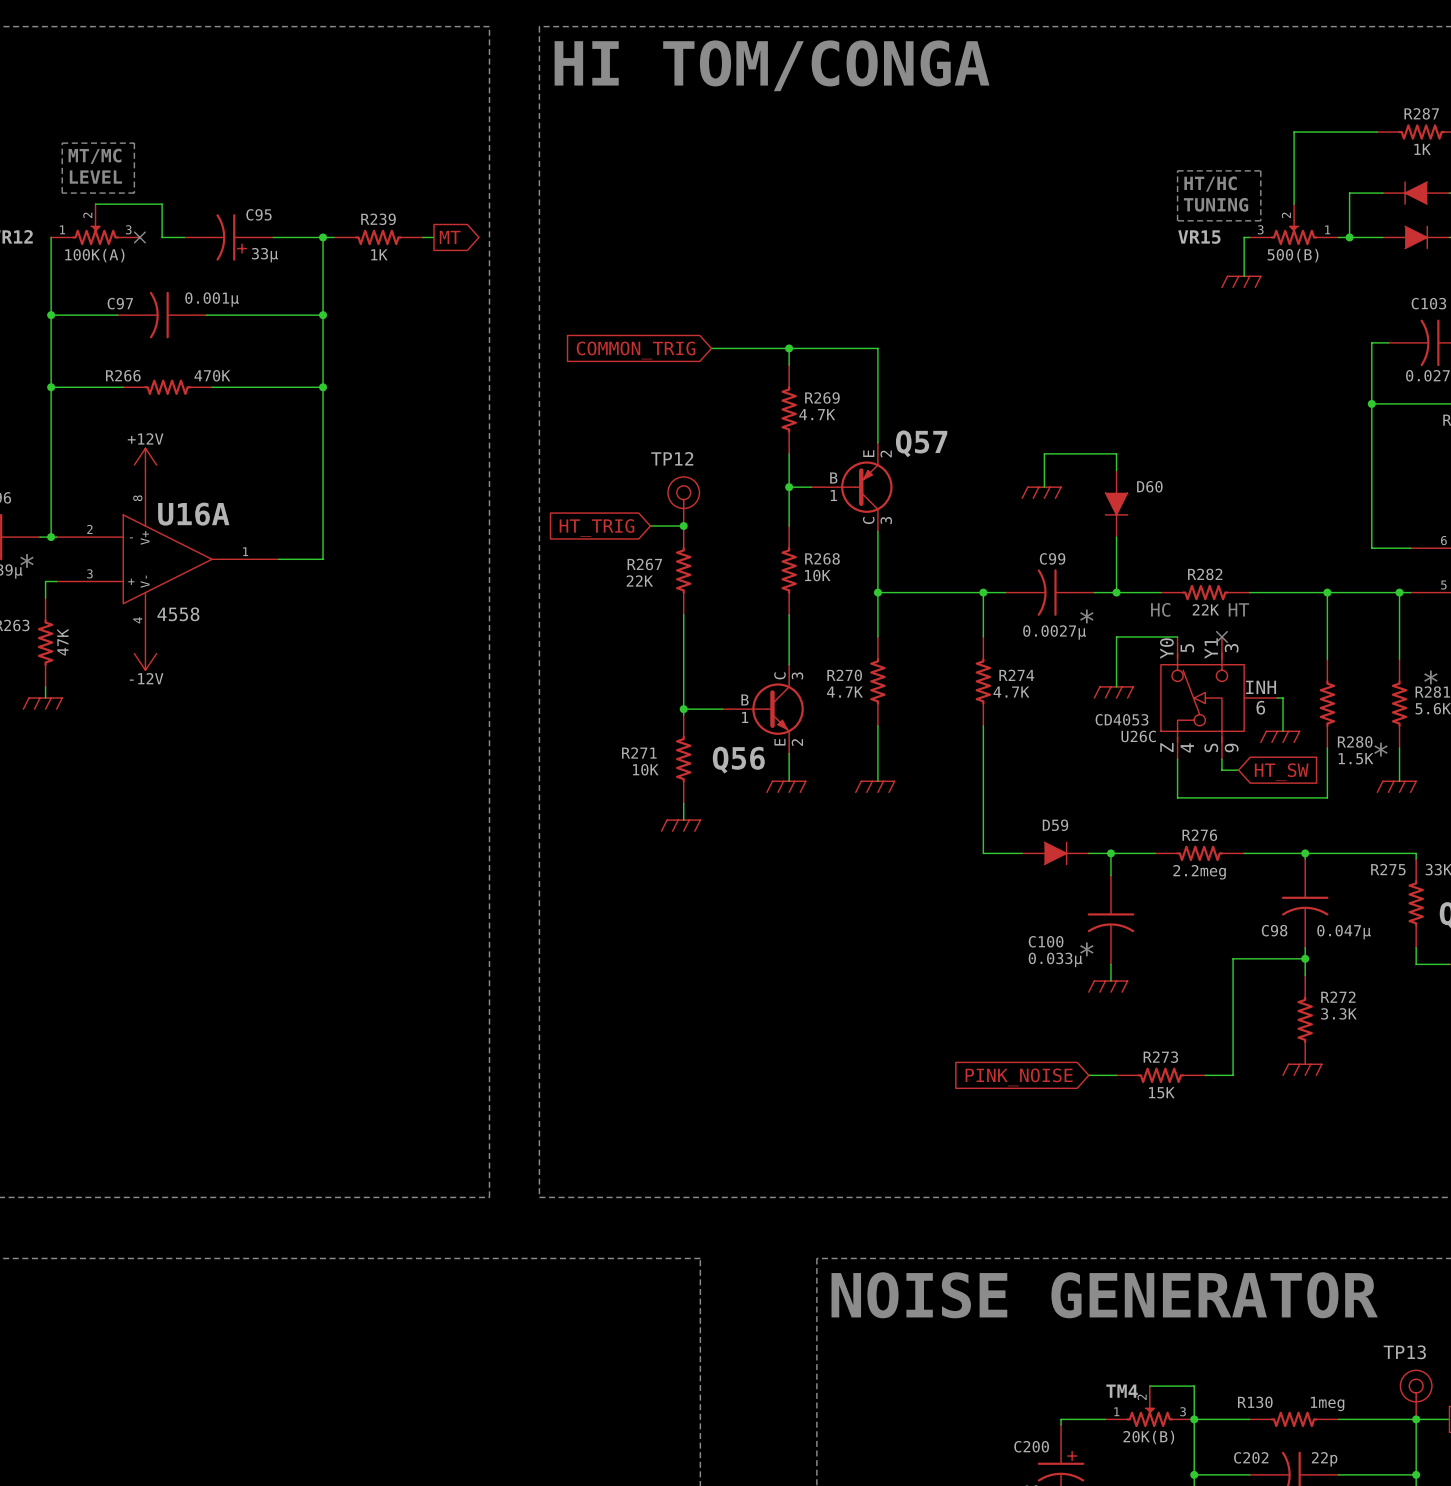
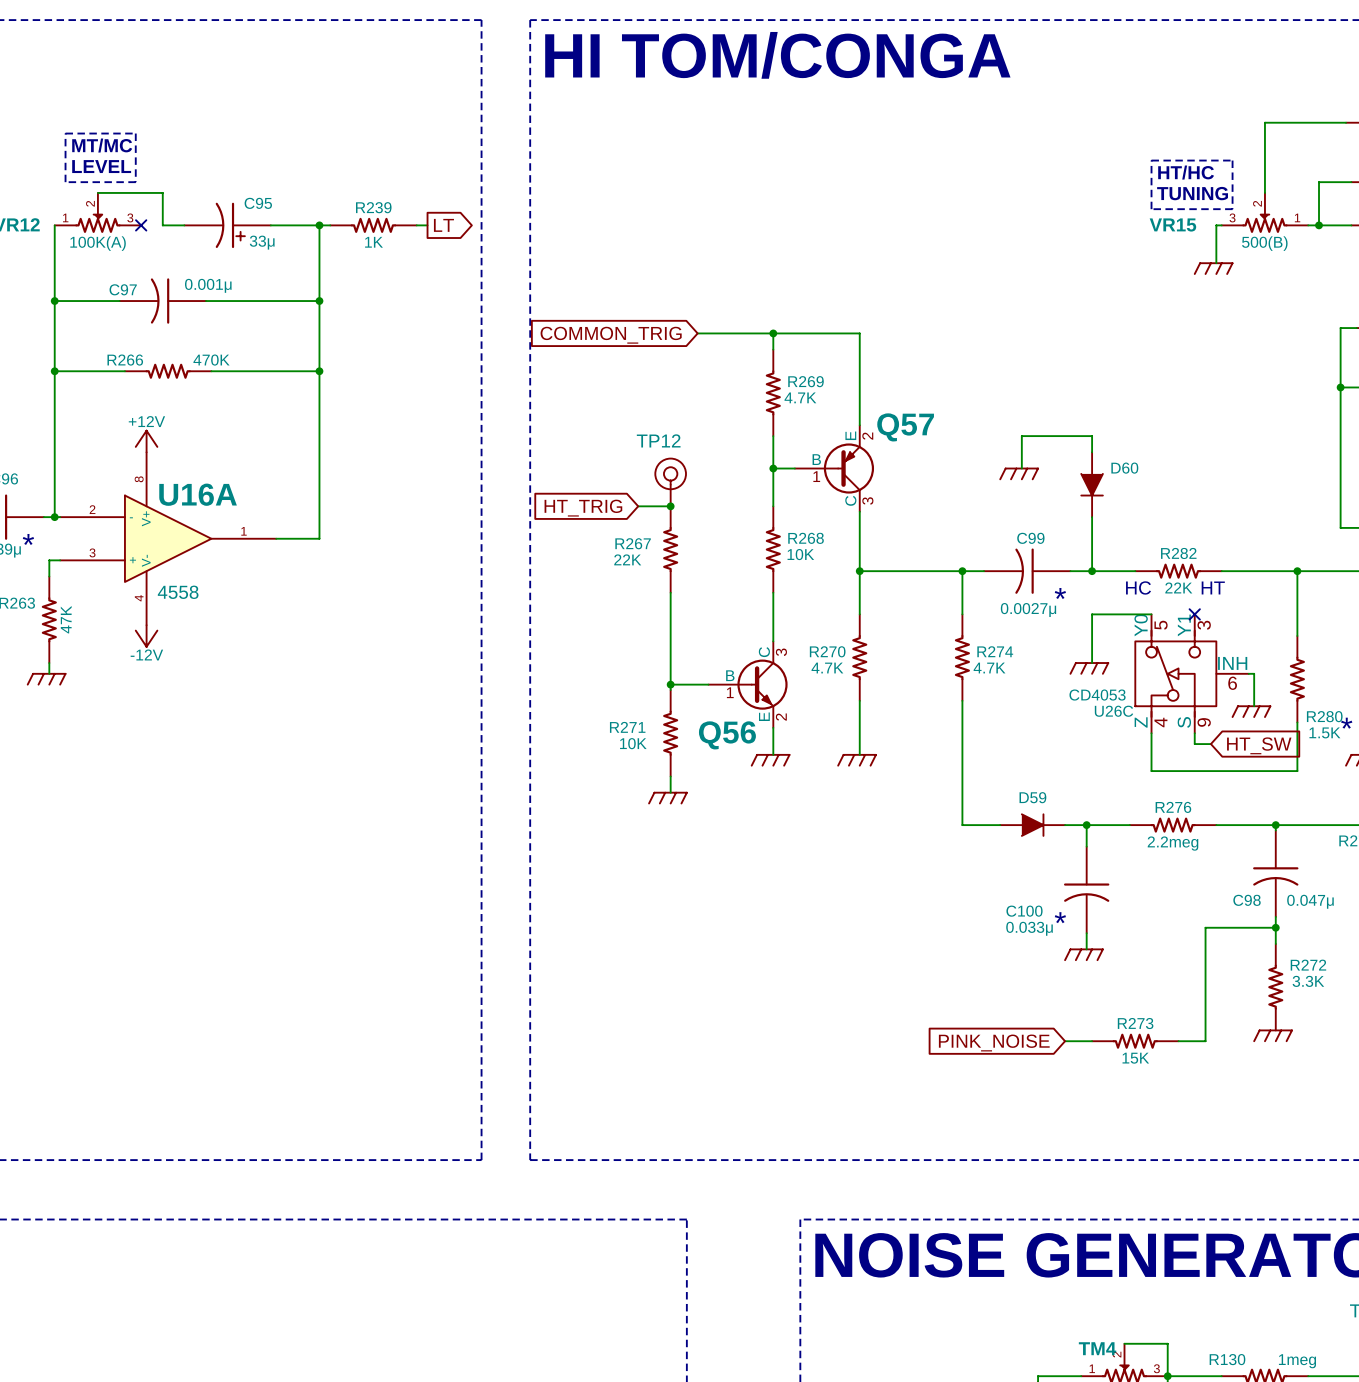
global label: MT (450, 237) -> LT (443, 225)

